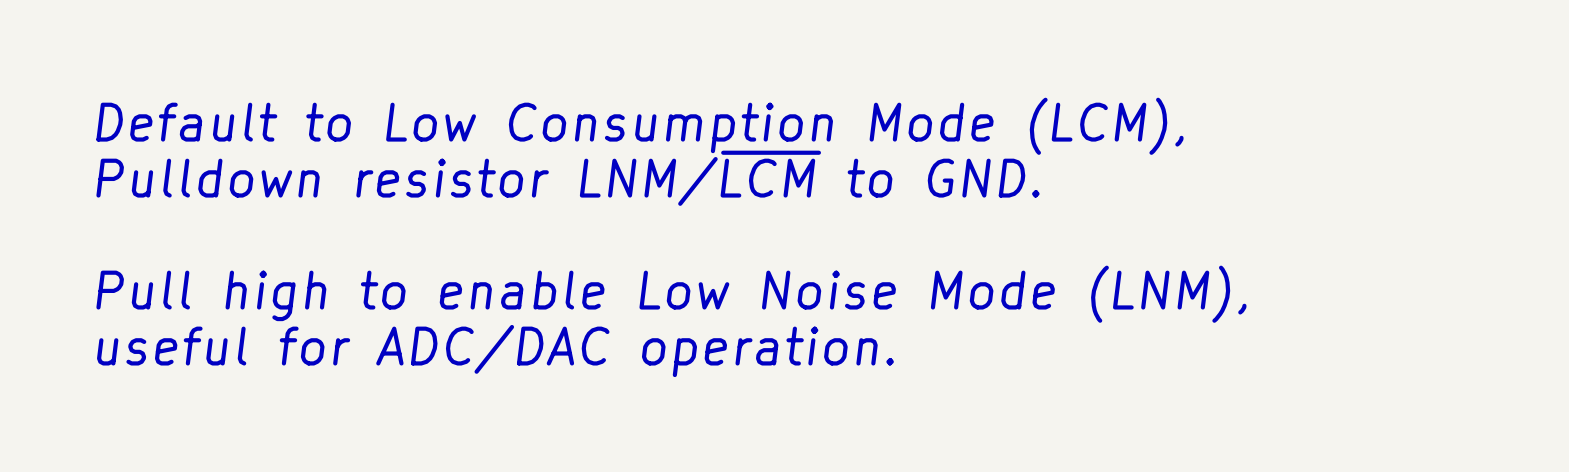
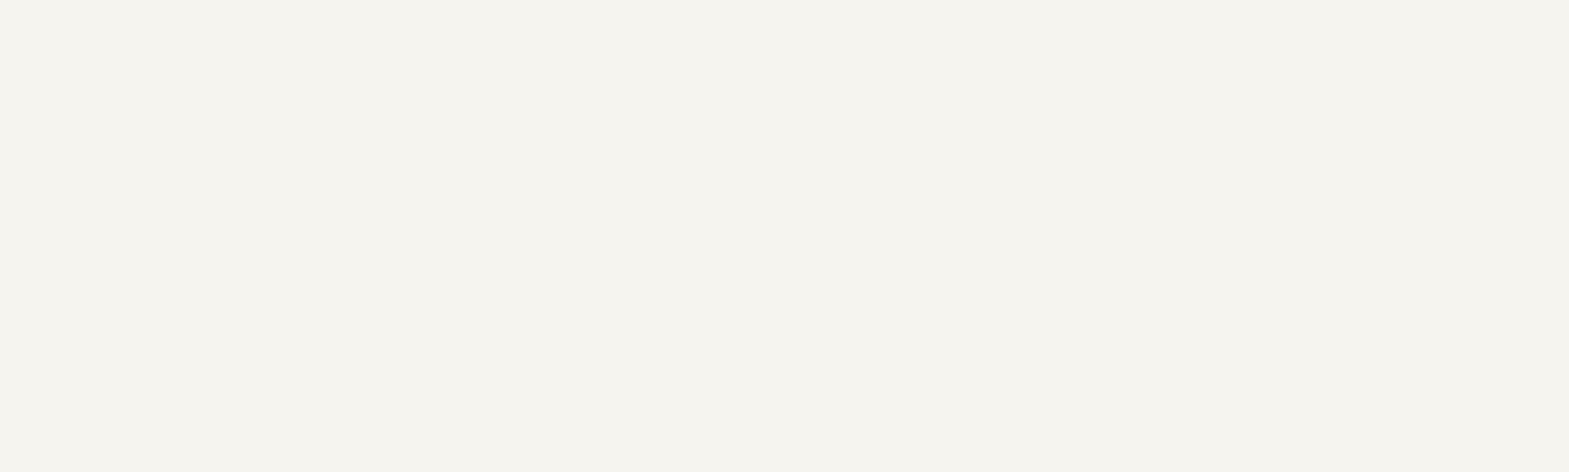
text: Default to Low Consumption Mode (LCM), (639, 126) -> none
text: Pulldown resistor LNM/~{LCM} to GND. (567, 178) -> none
text: Pull high to enable Low Noise Mode (LNM), (671, 294) -> none
text: useful for ADC/DAC operation. (495, 351) -> none

